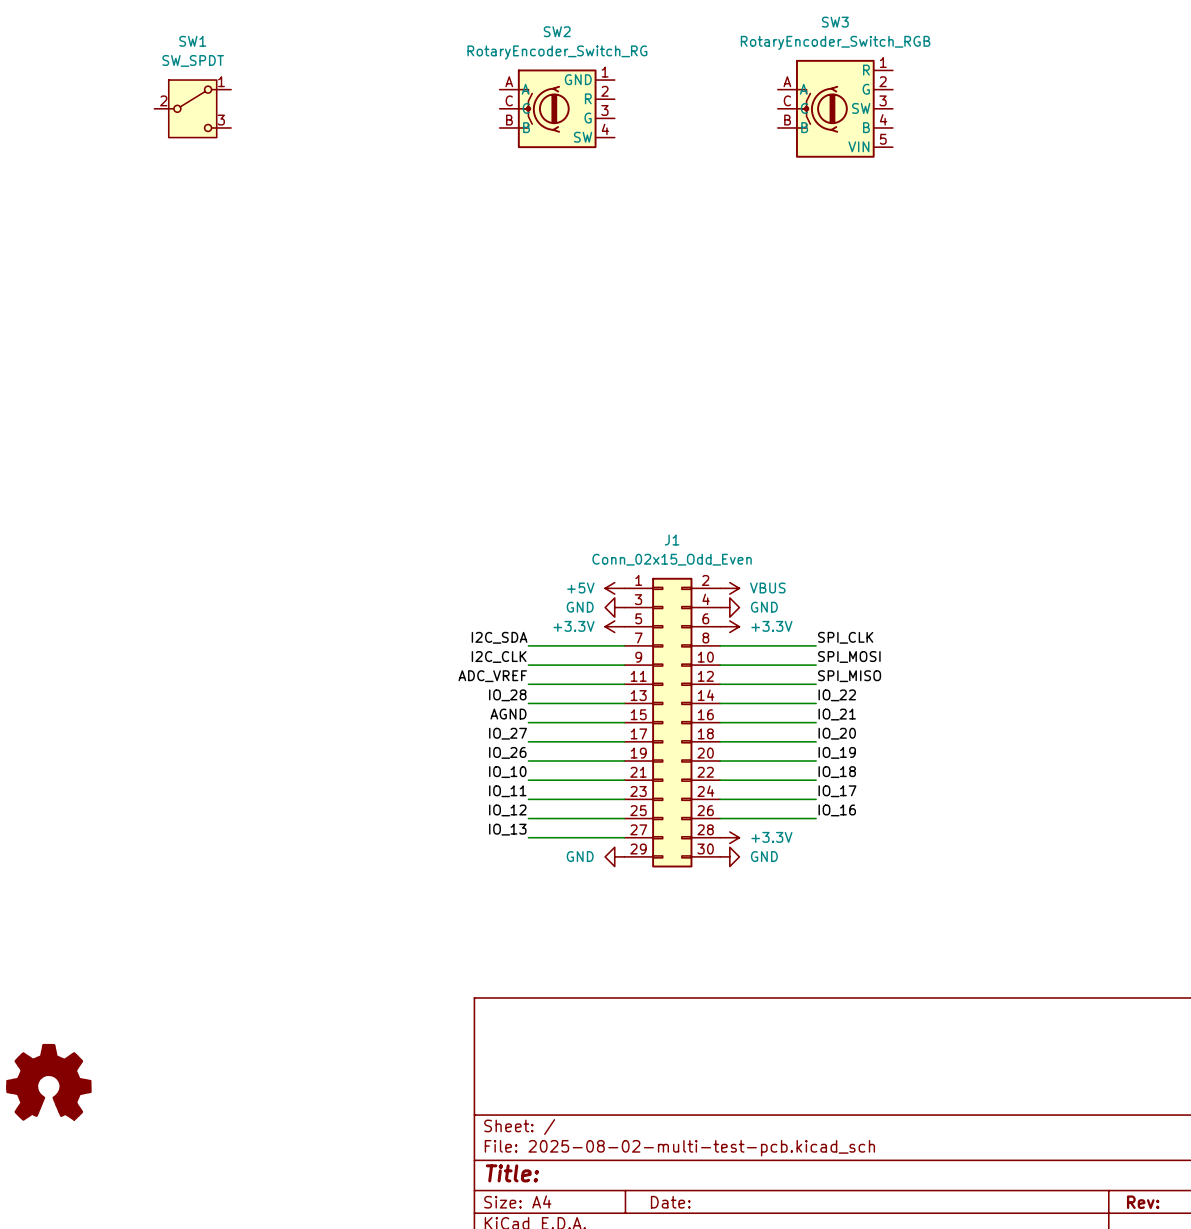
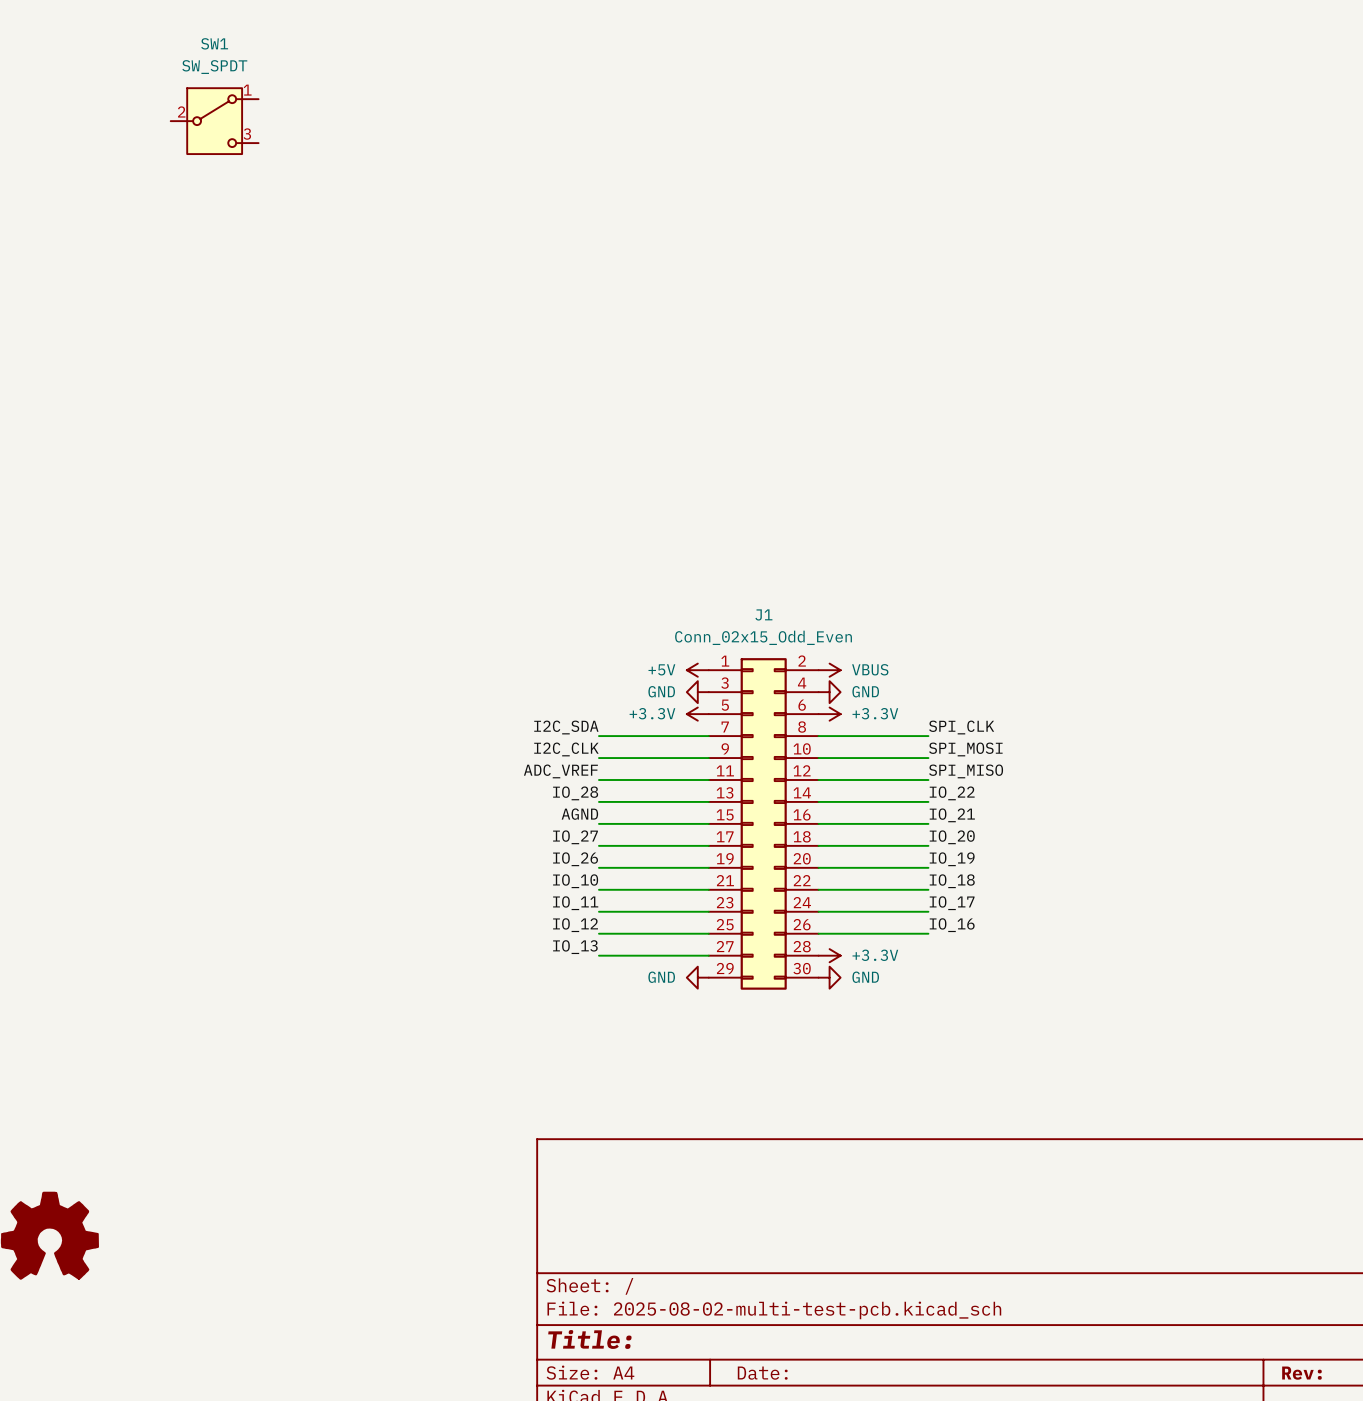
SW2: RotaryEncoder_Switch_RG (557, 108) -> none
SW3: RotaryEncoder_Switch_RGB (835, 108) -> none

